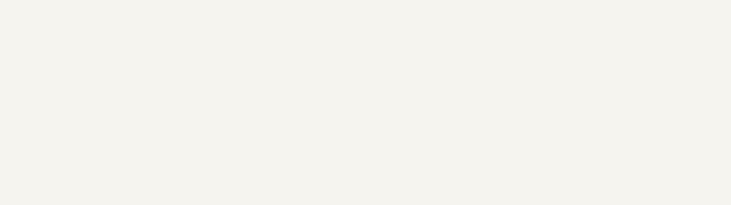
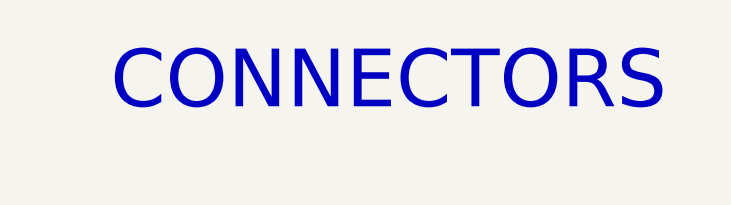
text: none -> CONNECTORS (388, 77)

